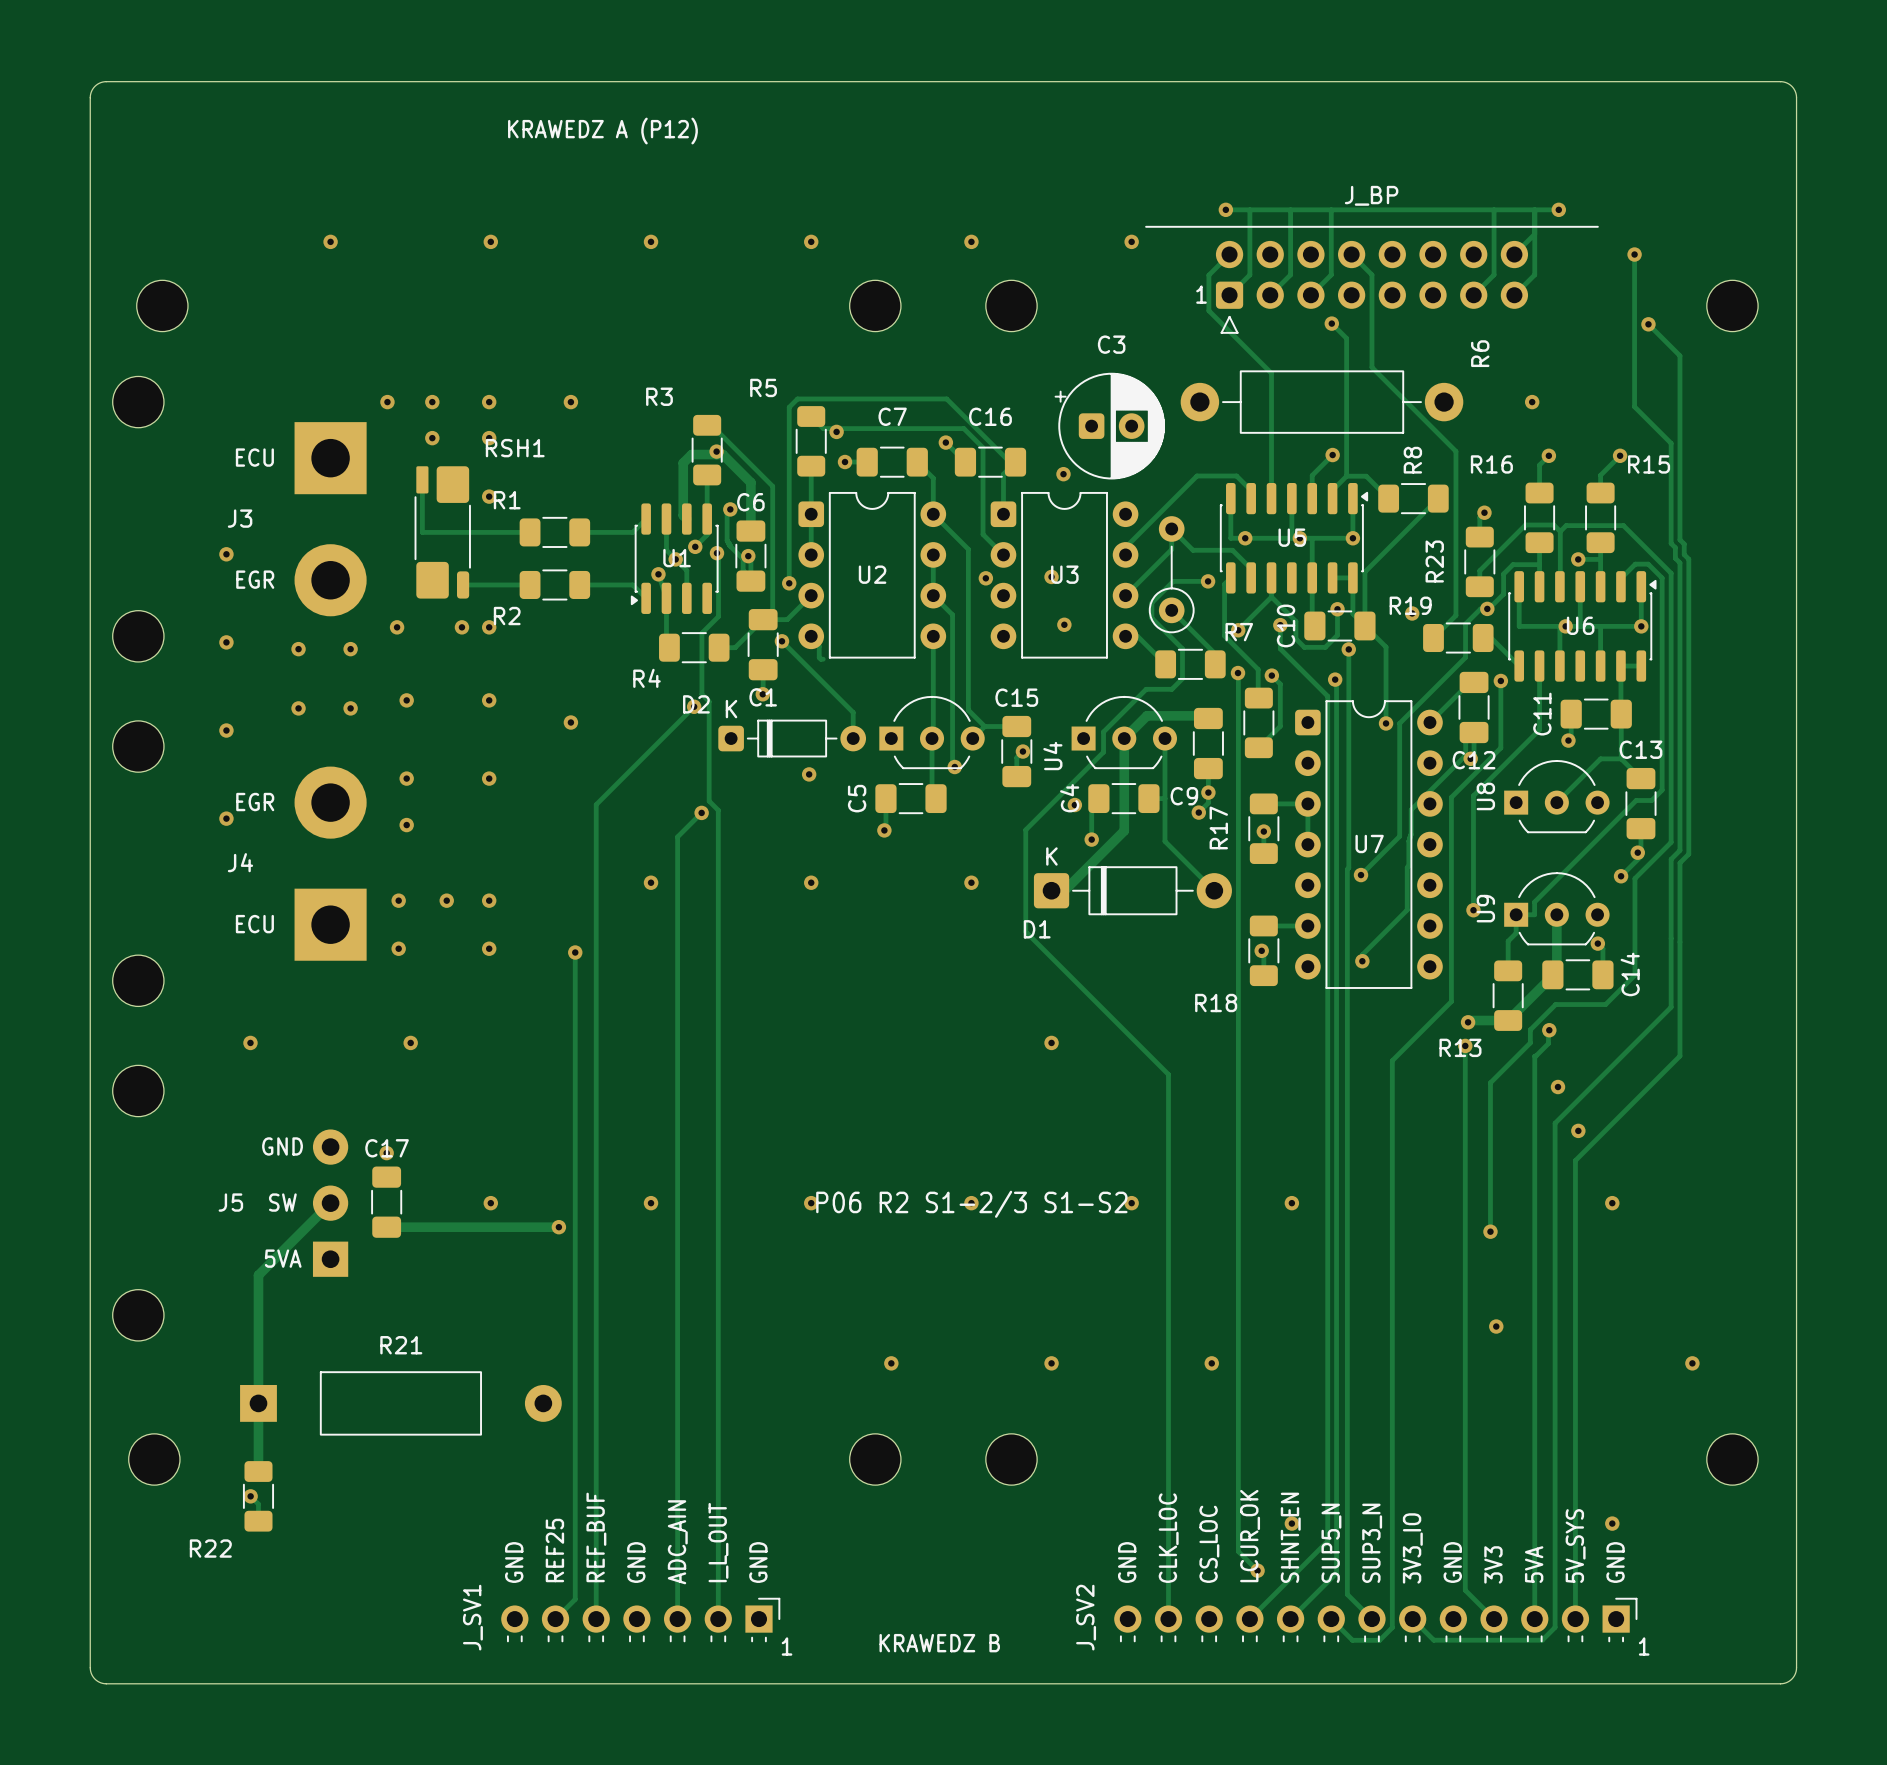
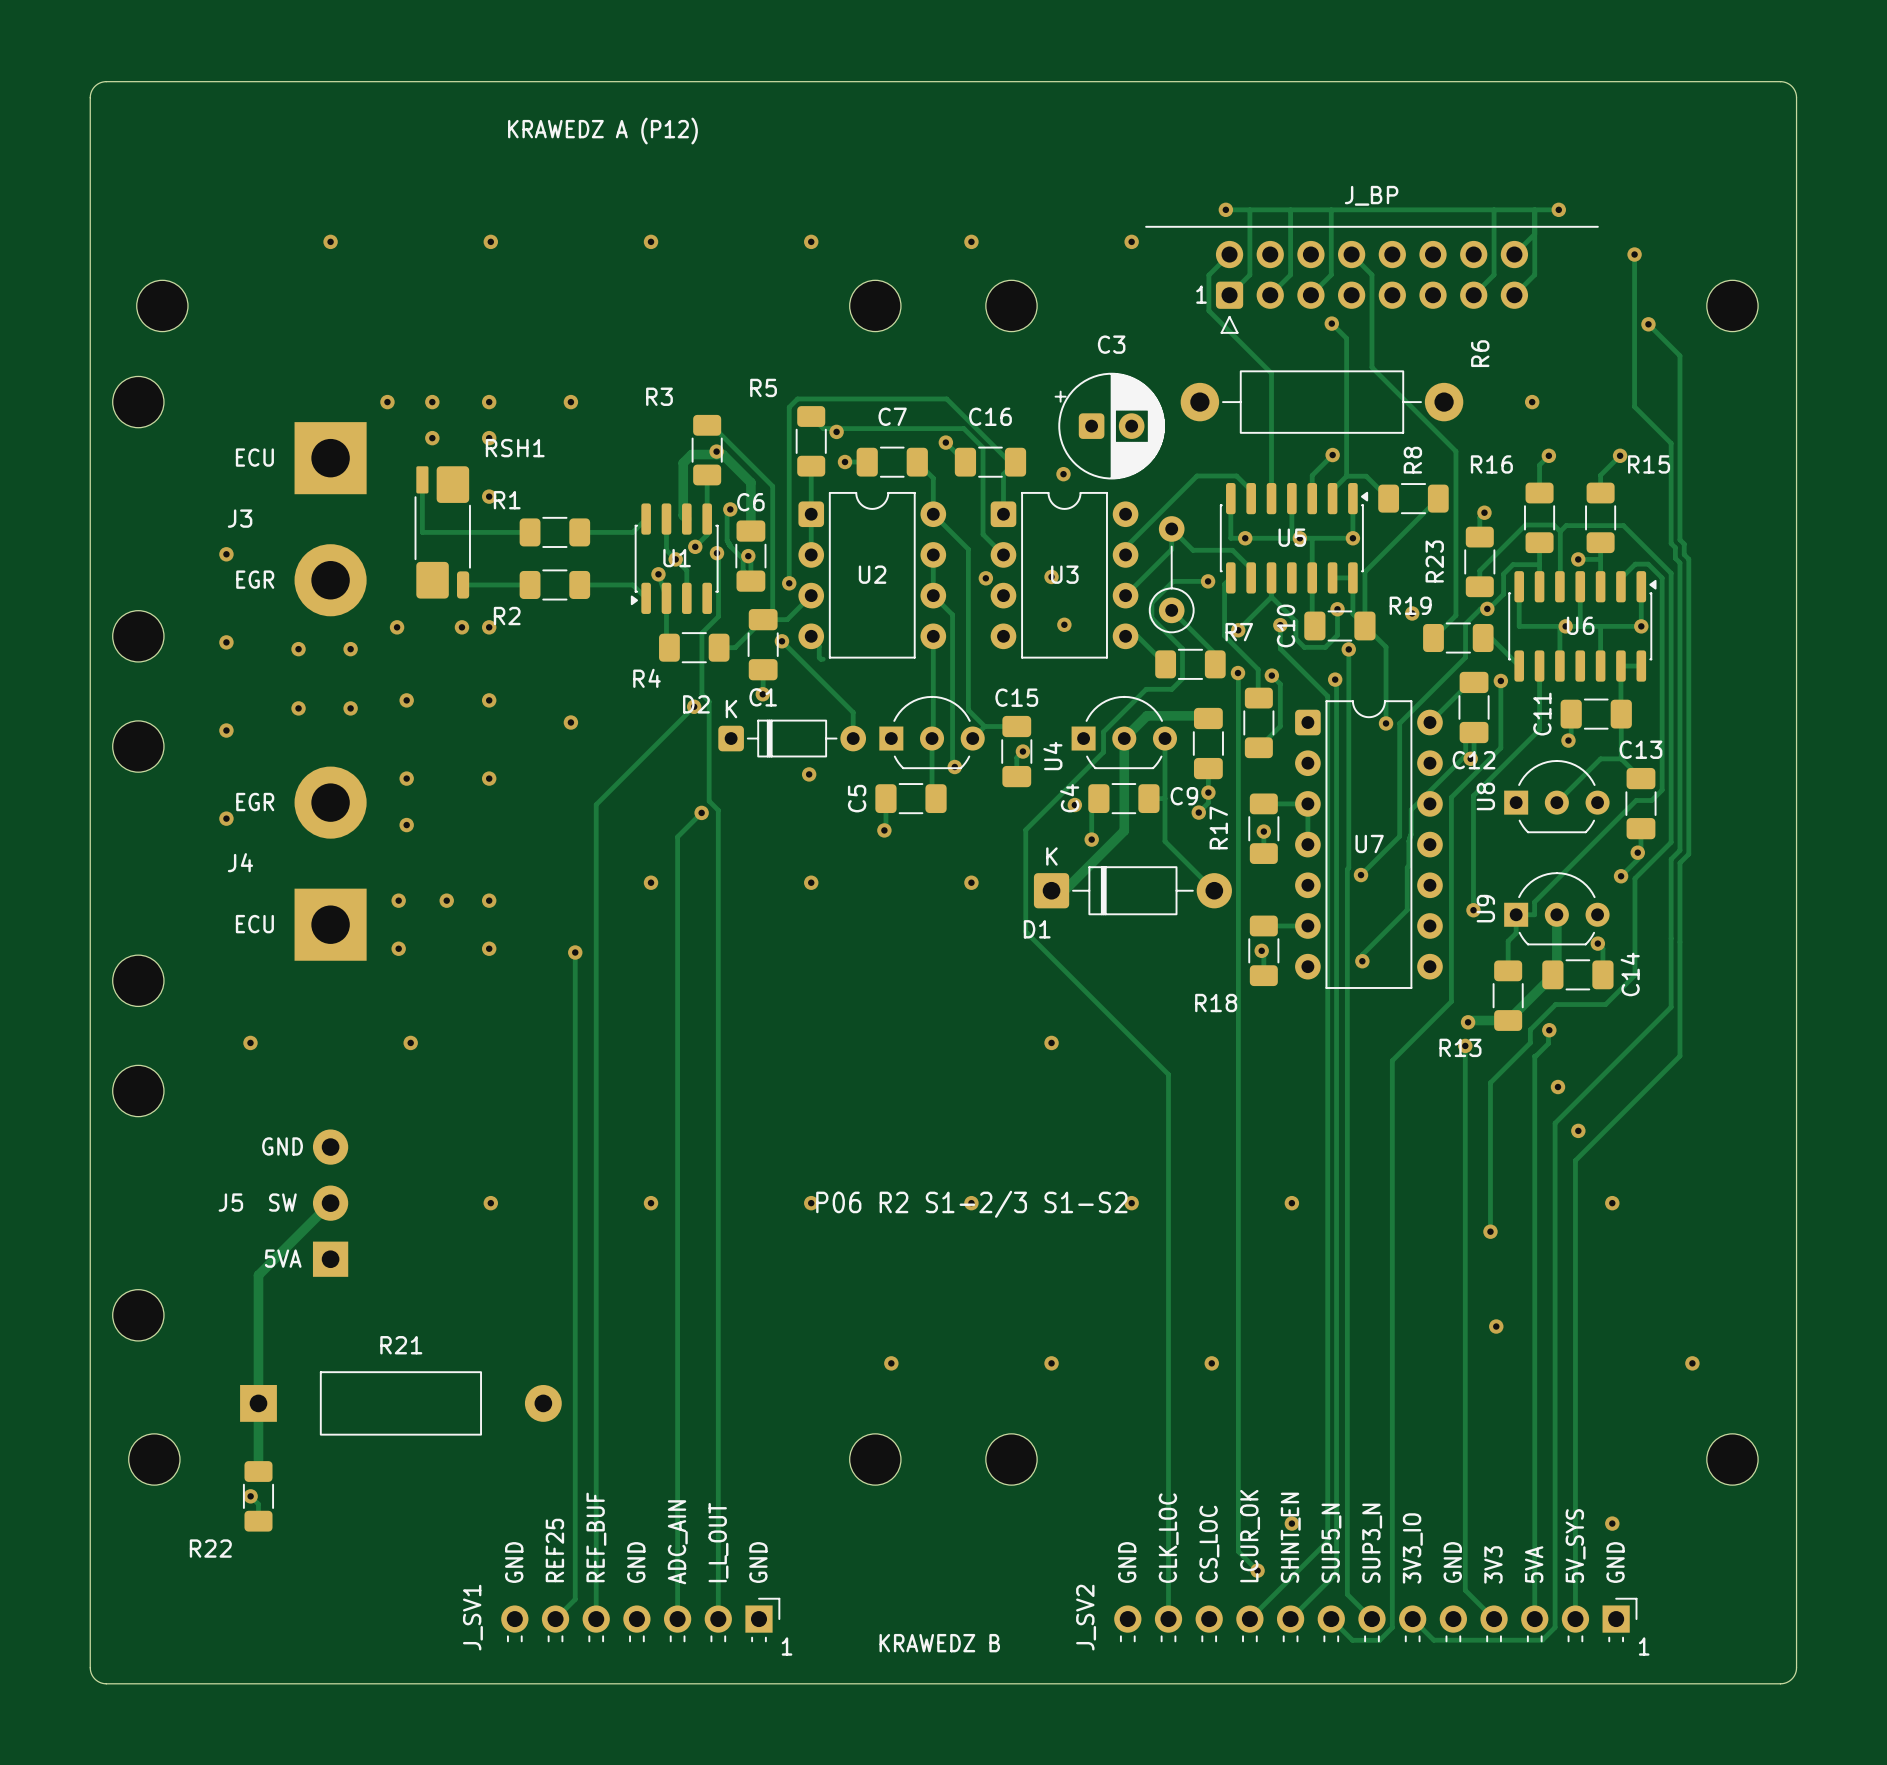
via: (386, 1153) -> none
C17: (386, 1202) -> none
track: (386, 1227) (558, 1227) -> none
via: (558, 1227) -> none

